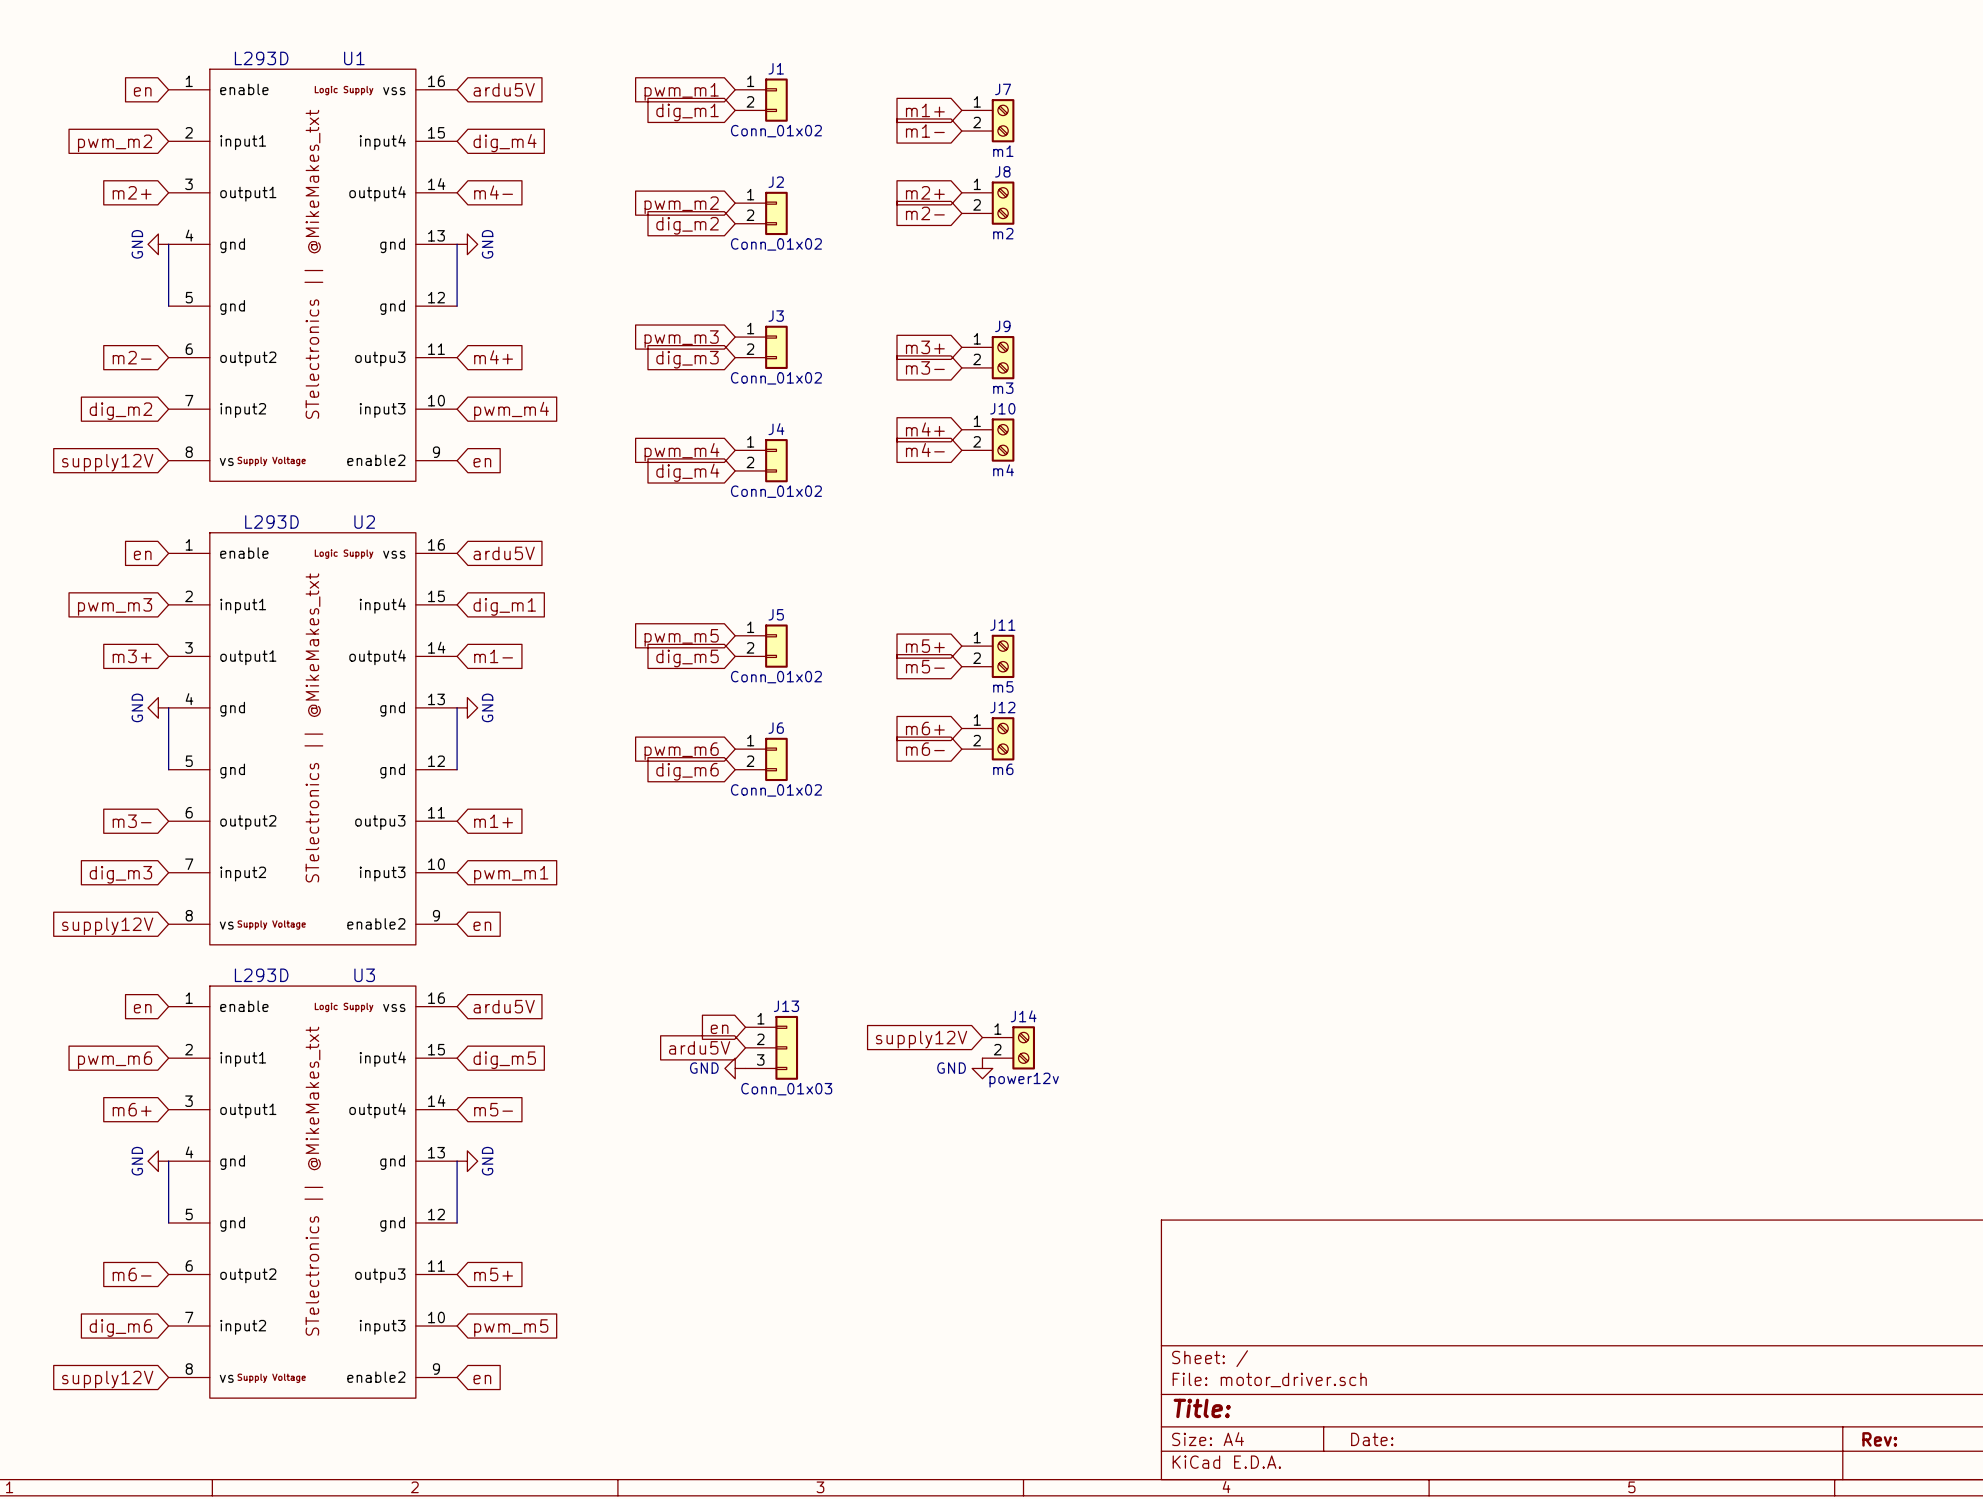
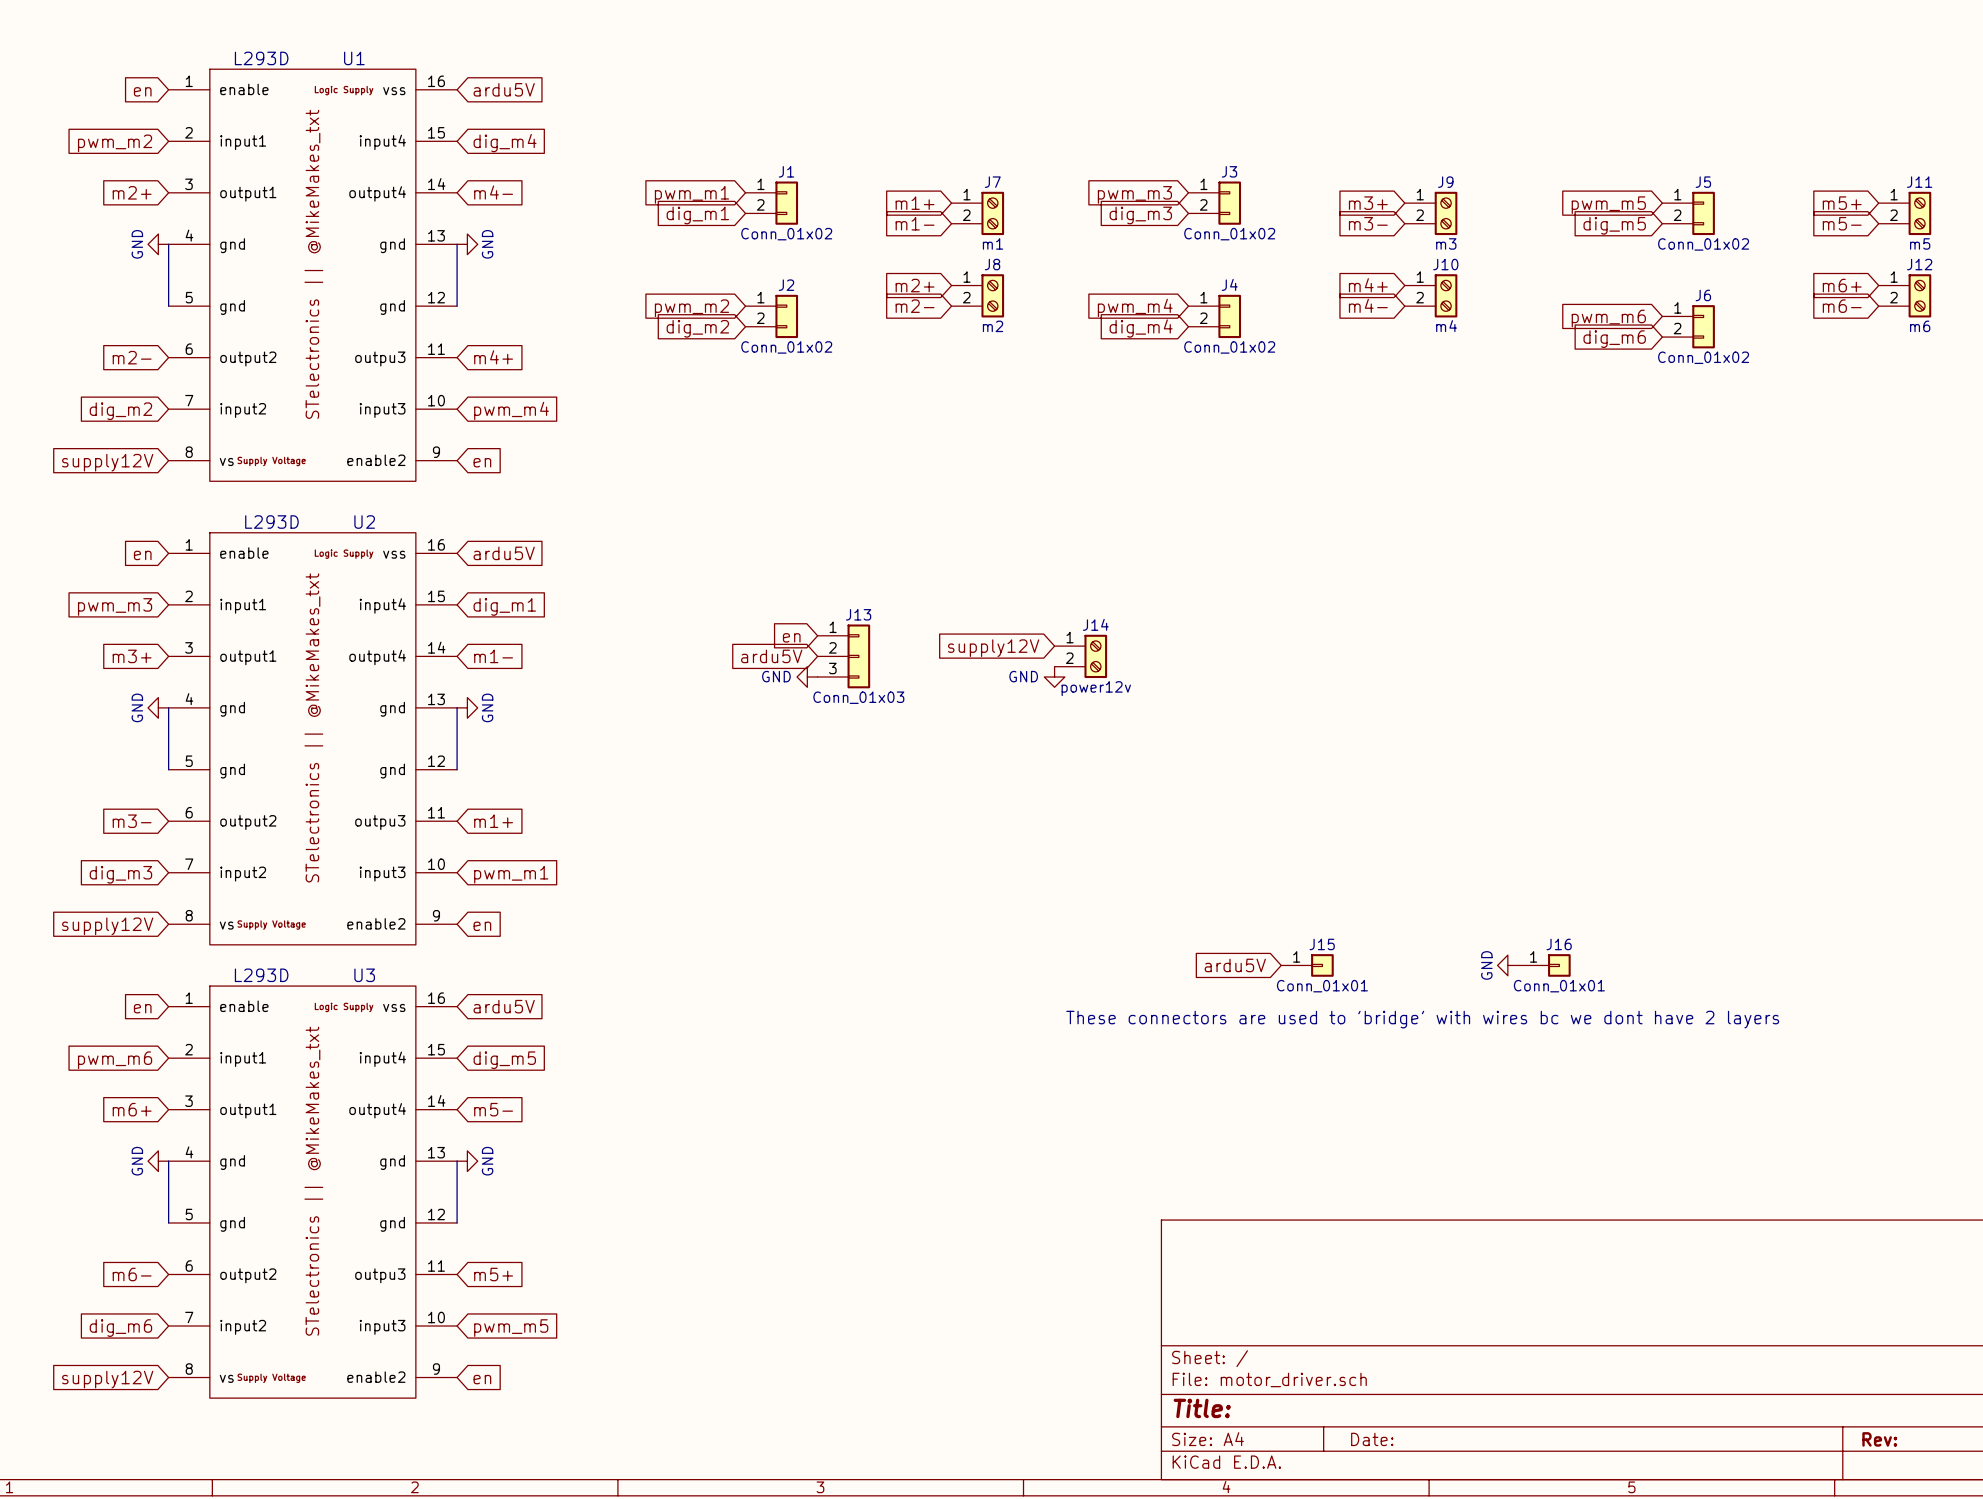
global label position: pwm_m1 (681, 91) -> pwm_m1 (691, 194)
J1 position: (761, 100) -> (771, 203)
global label position: m1+ (925, 110) -> m1+ (915, 203)
global label position: dig_m1 (687, 112) -> dig_m1 (697, 215)
J7 position: (988, 120) -> (977, 213)
global label position: m1- (925, 131) -> m1- (915, 223)
global label position: m2+ (925, 192) -> m2+ (915, 285)
global label: none -> pwm_m3 (1134, 194)
J8 position: (988, 203) -> (977, 295)
global label: none -> m3+ (1368, 203)
global label: none -> m5+ (1842, 203)
global label position: pwm_m2 (681, 205) -> pwm_m2 (691, 308)
global label: none -> pwm_m5 (1608, 205)
J2 position: (761, 213) -> (771, 316)
global label position: m2- (925, 213) -> m2- (915, 306)
global label: none -> dig_m3 (1140, 215)
global label: none -> m3- (1368, 223)
global label: none -> m5- (1842, 223)
global label position: dig_m2 (687, 225) -> dig_m2 (697, 328)
global label: none -> dig_m5 (1614, 225)
global label: none -> m4+ (1368, 285)
global label: none -> m6+ (1842, 285)
global label: none -> m4- (1368, 305)
global label: none -> m6- (1842, 306)
global label: none -> pwm_m4 (1135, 307)
global label: none -> pwm_m6 (1608, 318)
global label: none -> dig_m4 (1141, 328)
global label: pwm_m3 (681, 339) -> none
global label: none -> dig_m6 (1614, 339)
J3 position: (761, 347) -> (1214, 203)
global label: m3+ (925, 347) -> none
J9 position: (988, 357) -> (1431, 213)
global label: dig_m3 (687, 359) -> none
global label: m3- (925, 367) -> none
global label: m4+ (925, 429) -> none
J10 position: (988, 440) -> (1431, 295)
global label: m4- (925, 450) -> none
global label: pwm_m4 (681, 452) -> none
J4 position: (761, 460) -> (1214, 316)
global label: dig_m4 (687, 472) -> none
global label: pwm_m5 (681, 637) -> none
global label: none -> en (791, 637)
J5 position: (761, 646) -> (1688, 213)
global label: m5+ (925, 646) -> none
global label: none -> supply12V (993, 648)
global label: none -> ardu5V (771, 656)
J11 position: (988, 656) -> (1904, 213)
global label: dig_m5 (687, 658) -> none
global label: m5- (925, 666) -> none
power symbol: none -> GND (807, 677)
power symbol: none -> GND (1054, 677)
global label: m6+ (925, 728) -> none
J12 position: (988, 738) -> (1904, 295)
global label: m6- (925, 749) -> none
global label: pwm_m6 (681, 751) -> none
J6 position: (761, 759) -> (1688, 326)
global label: dig_m6 (687, 771) -> none
global label: none -> ardu5V (1235, 965)
J15: none -> Conn_01x01 (1307, 965)
power symbol: none -> GND (1507, 965)
J16: none -> Conn_01x01 (1544, 965)
text: none -> These connectors are used to 'bridge' with wires bc we dont have 2 layers (1422, 1019)
global label: en (719, 1029) -> none
global label: supply12V (921, 1039) -> none
global label: ardu5V (699, 1047) -> none
J13 position: (771, 1047) -> (843, 656)
J14 position: (1008, 1047) -> (1080, 656)
power symbol: GND (735, 1068) -> none
power symbol: GND (982, 1068) -> none

